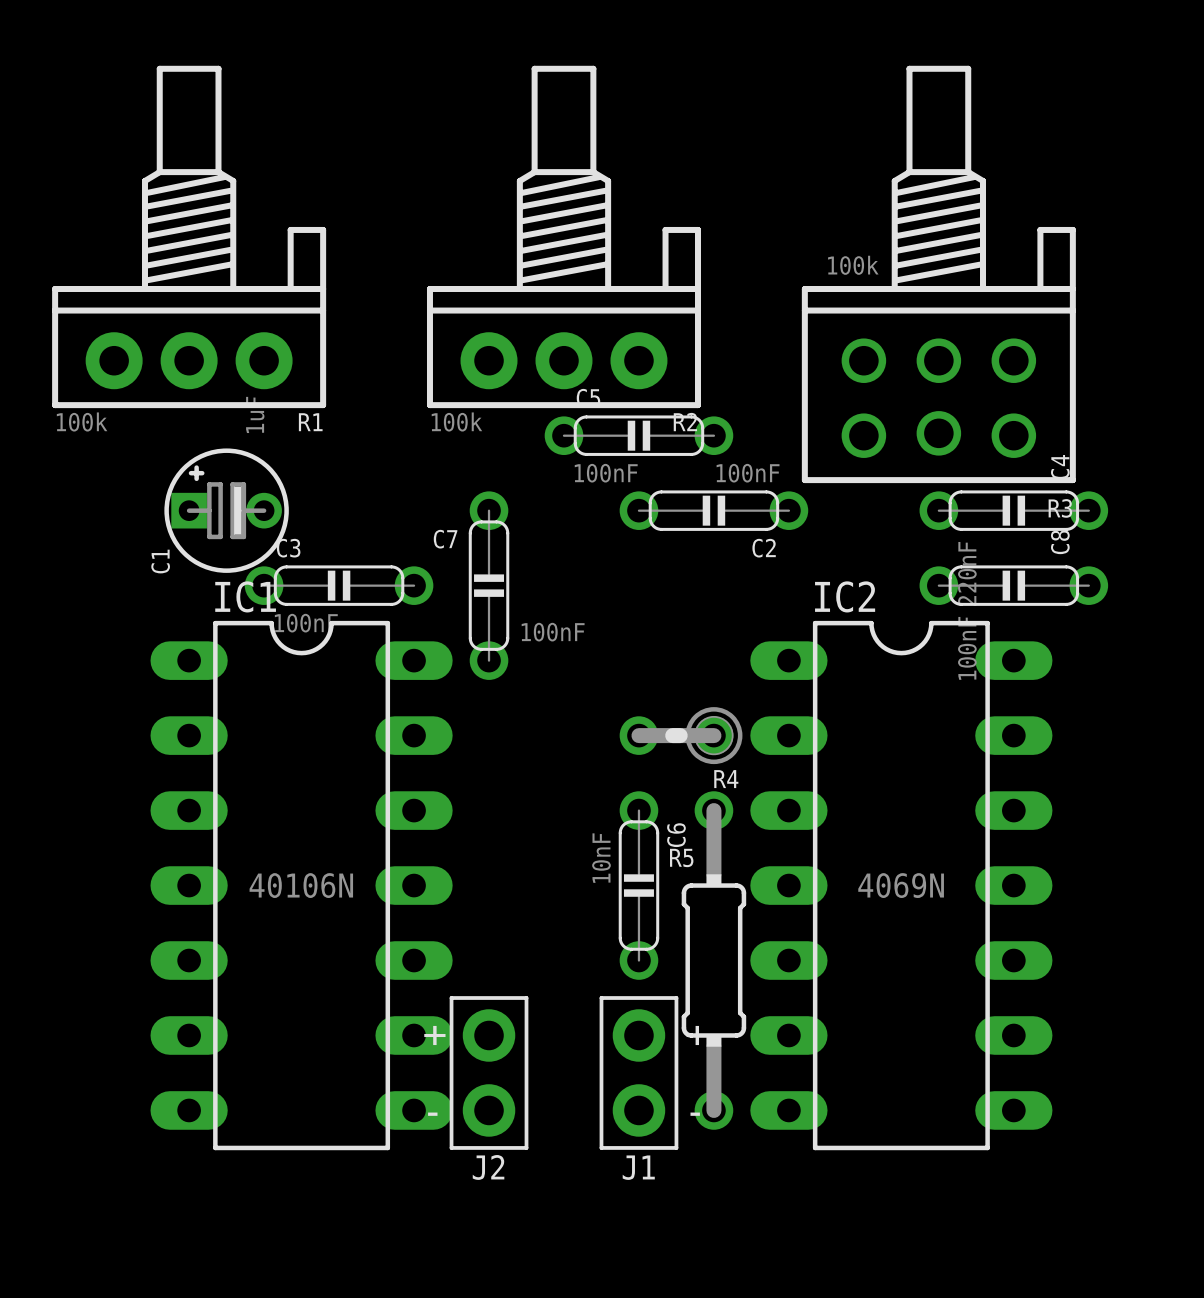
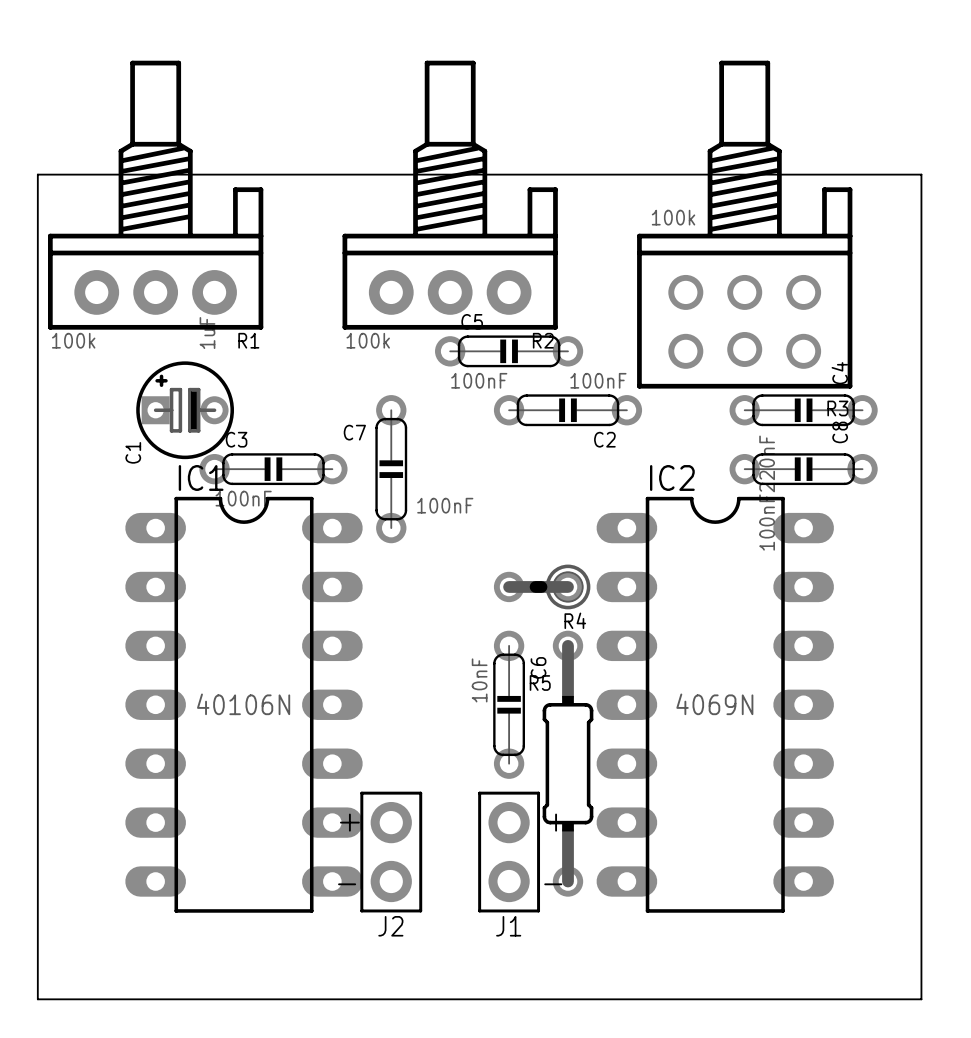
board edge: none -> (37, 174) (921, 174) (921, 999) (37, 999) (37, 174)

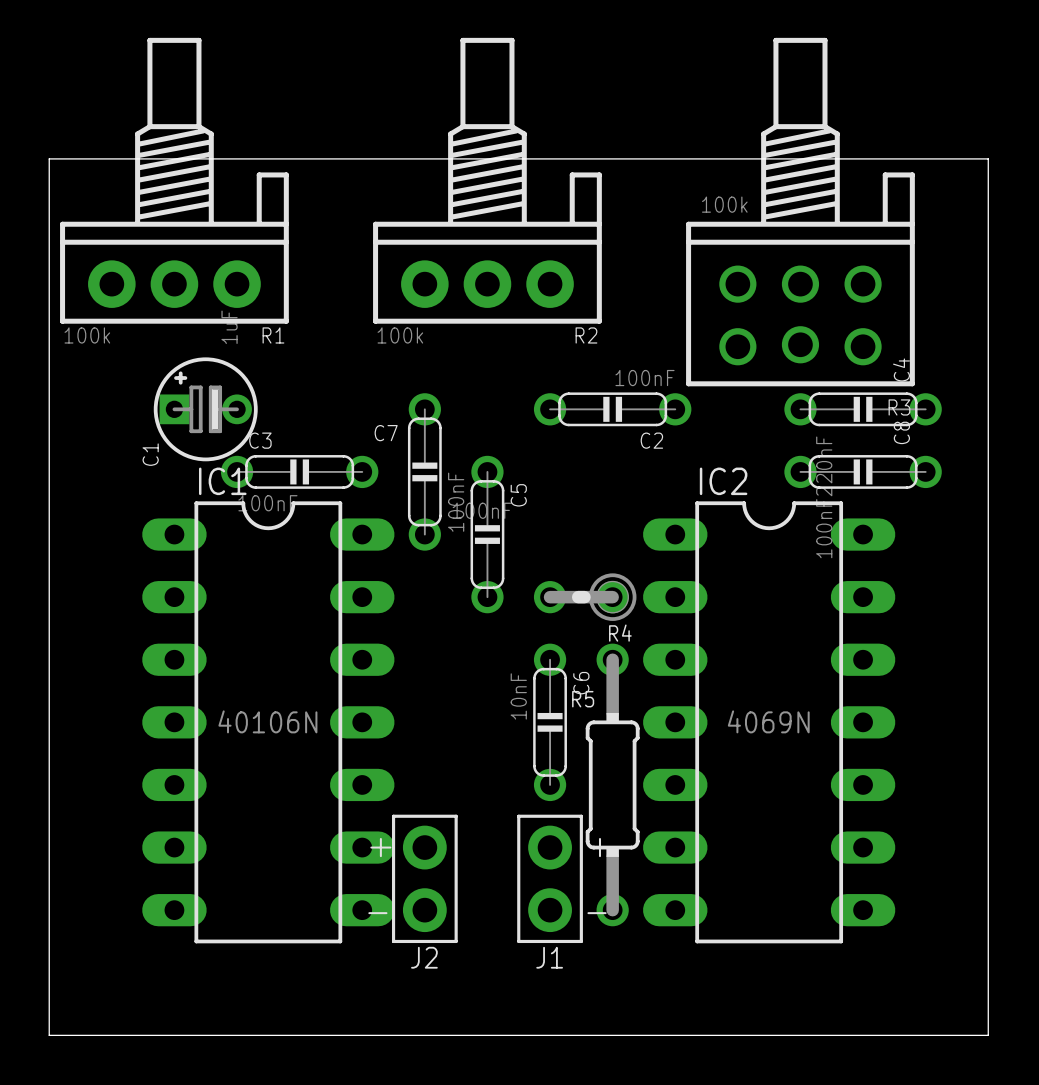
C5 rotation: 0° (509, 351) -> 90° clockwise (487, 534)
C5 position: (509, 351) -> (487, 534)

